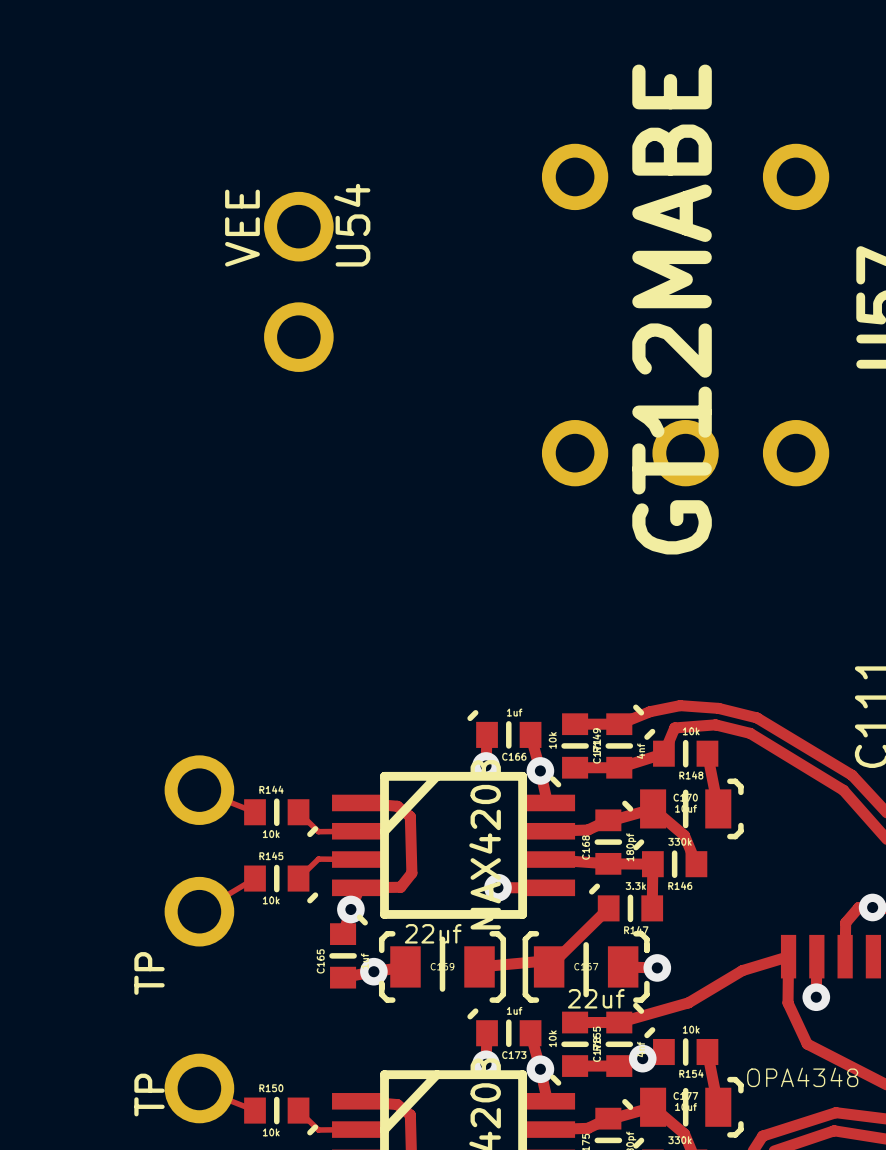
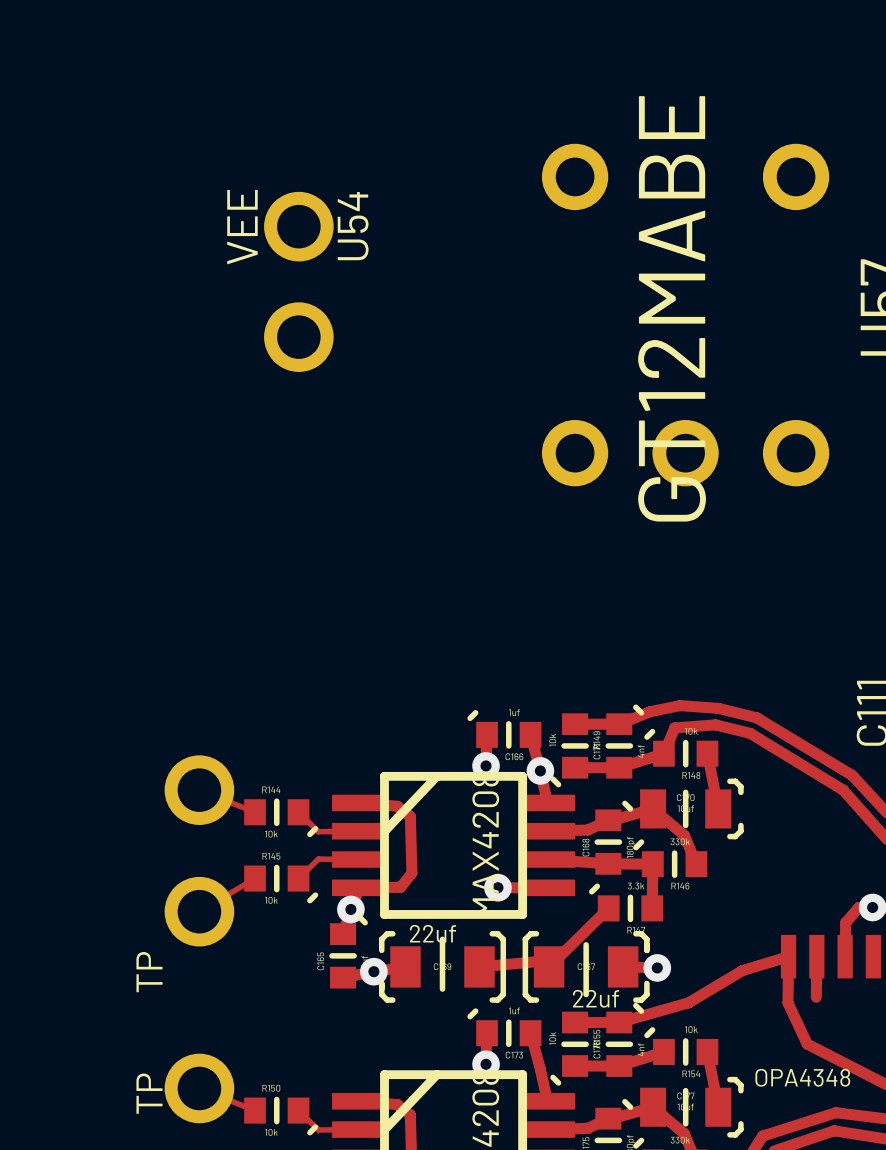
via: (816, 997) -> none
via: (642, 1058) -> none
via: (540, 1069) -> none

